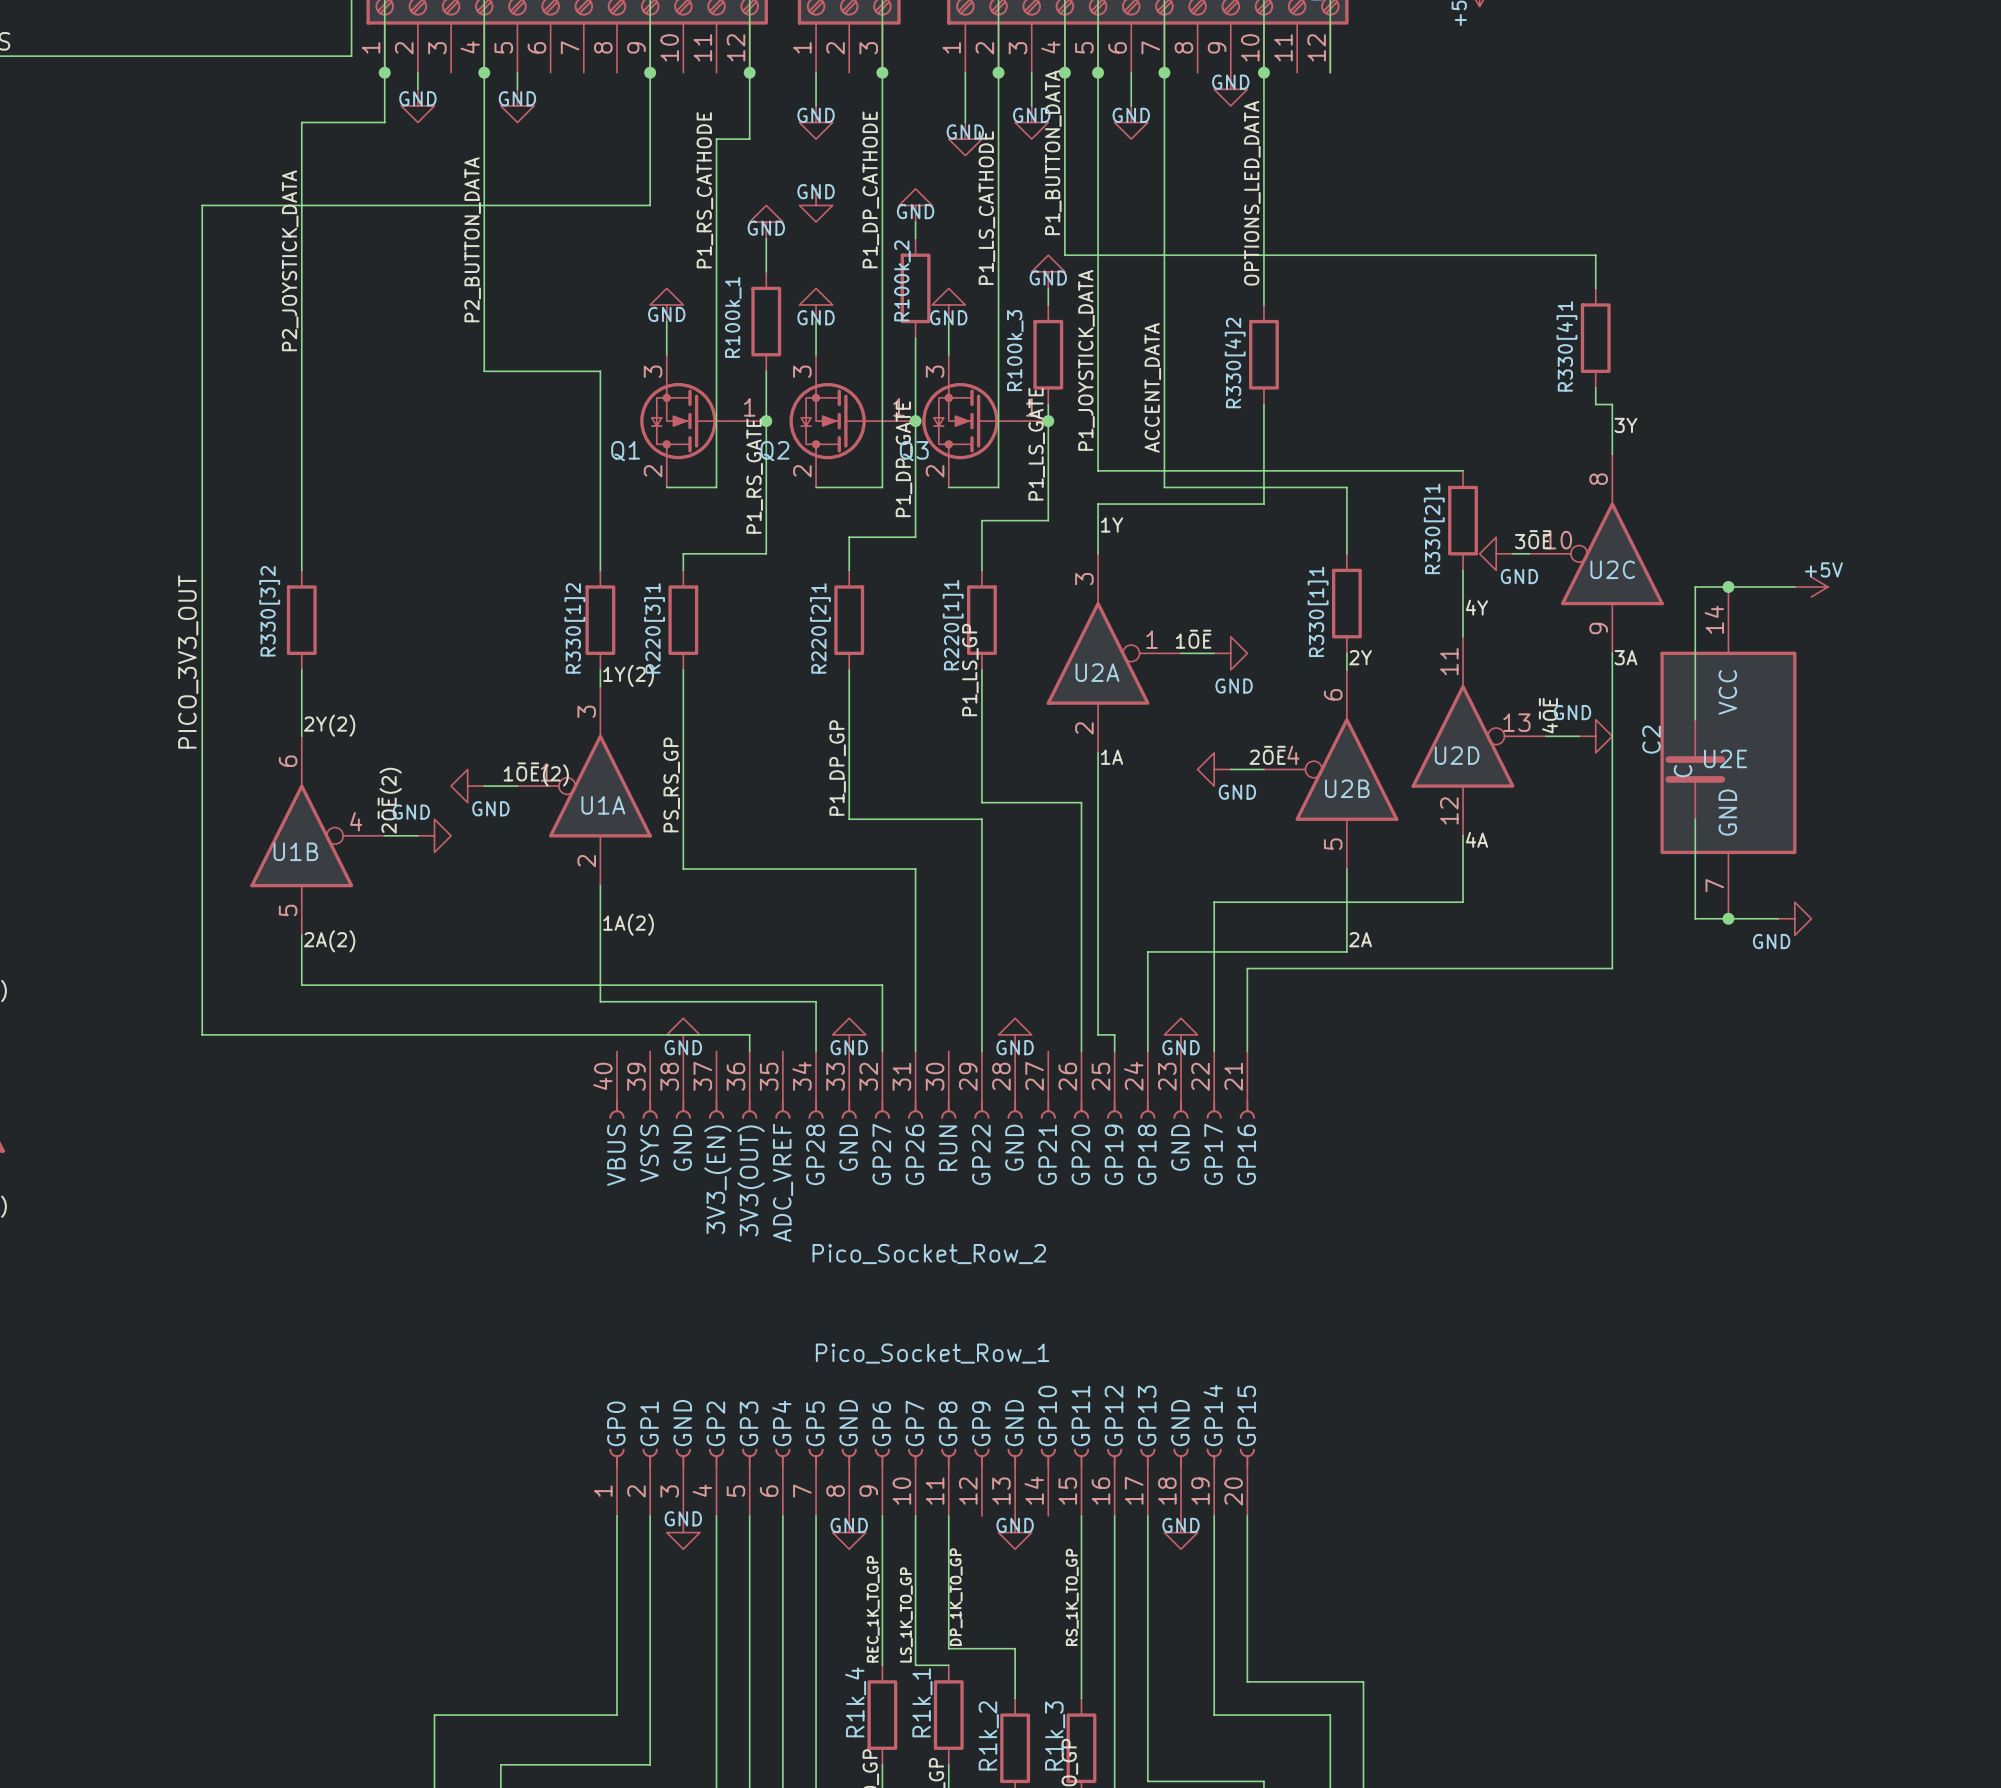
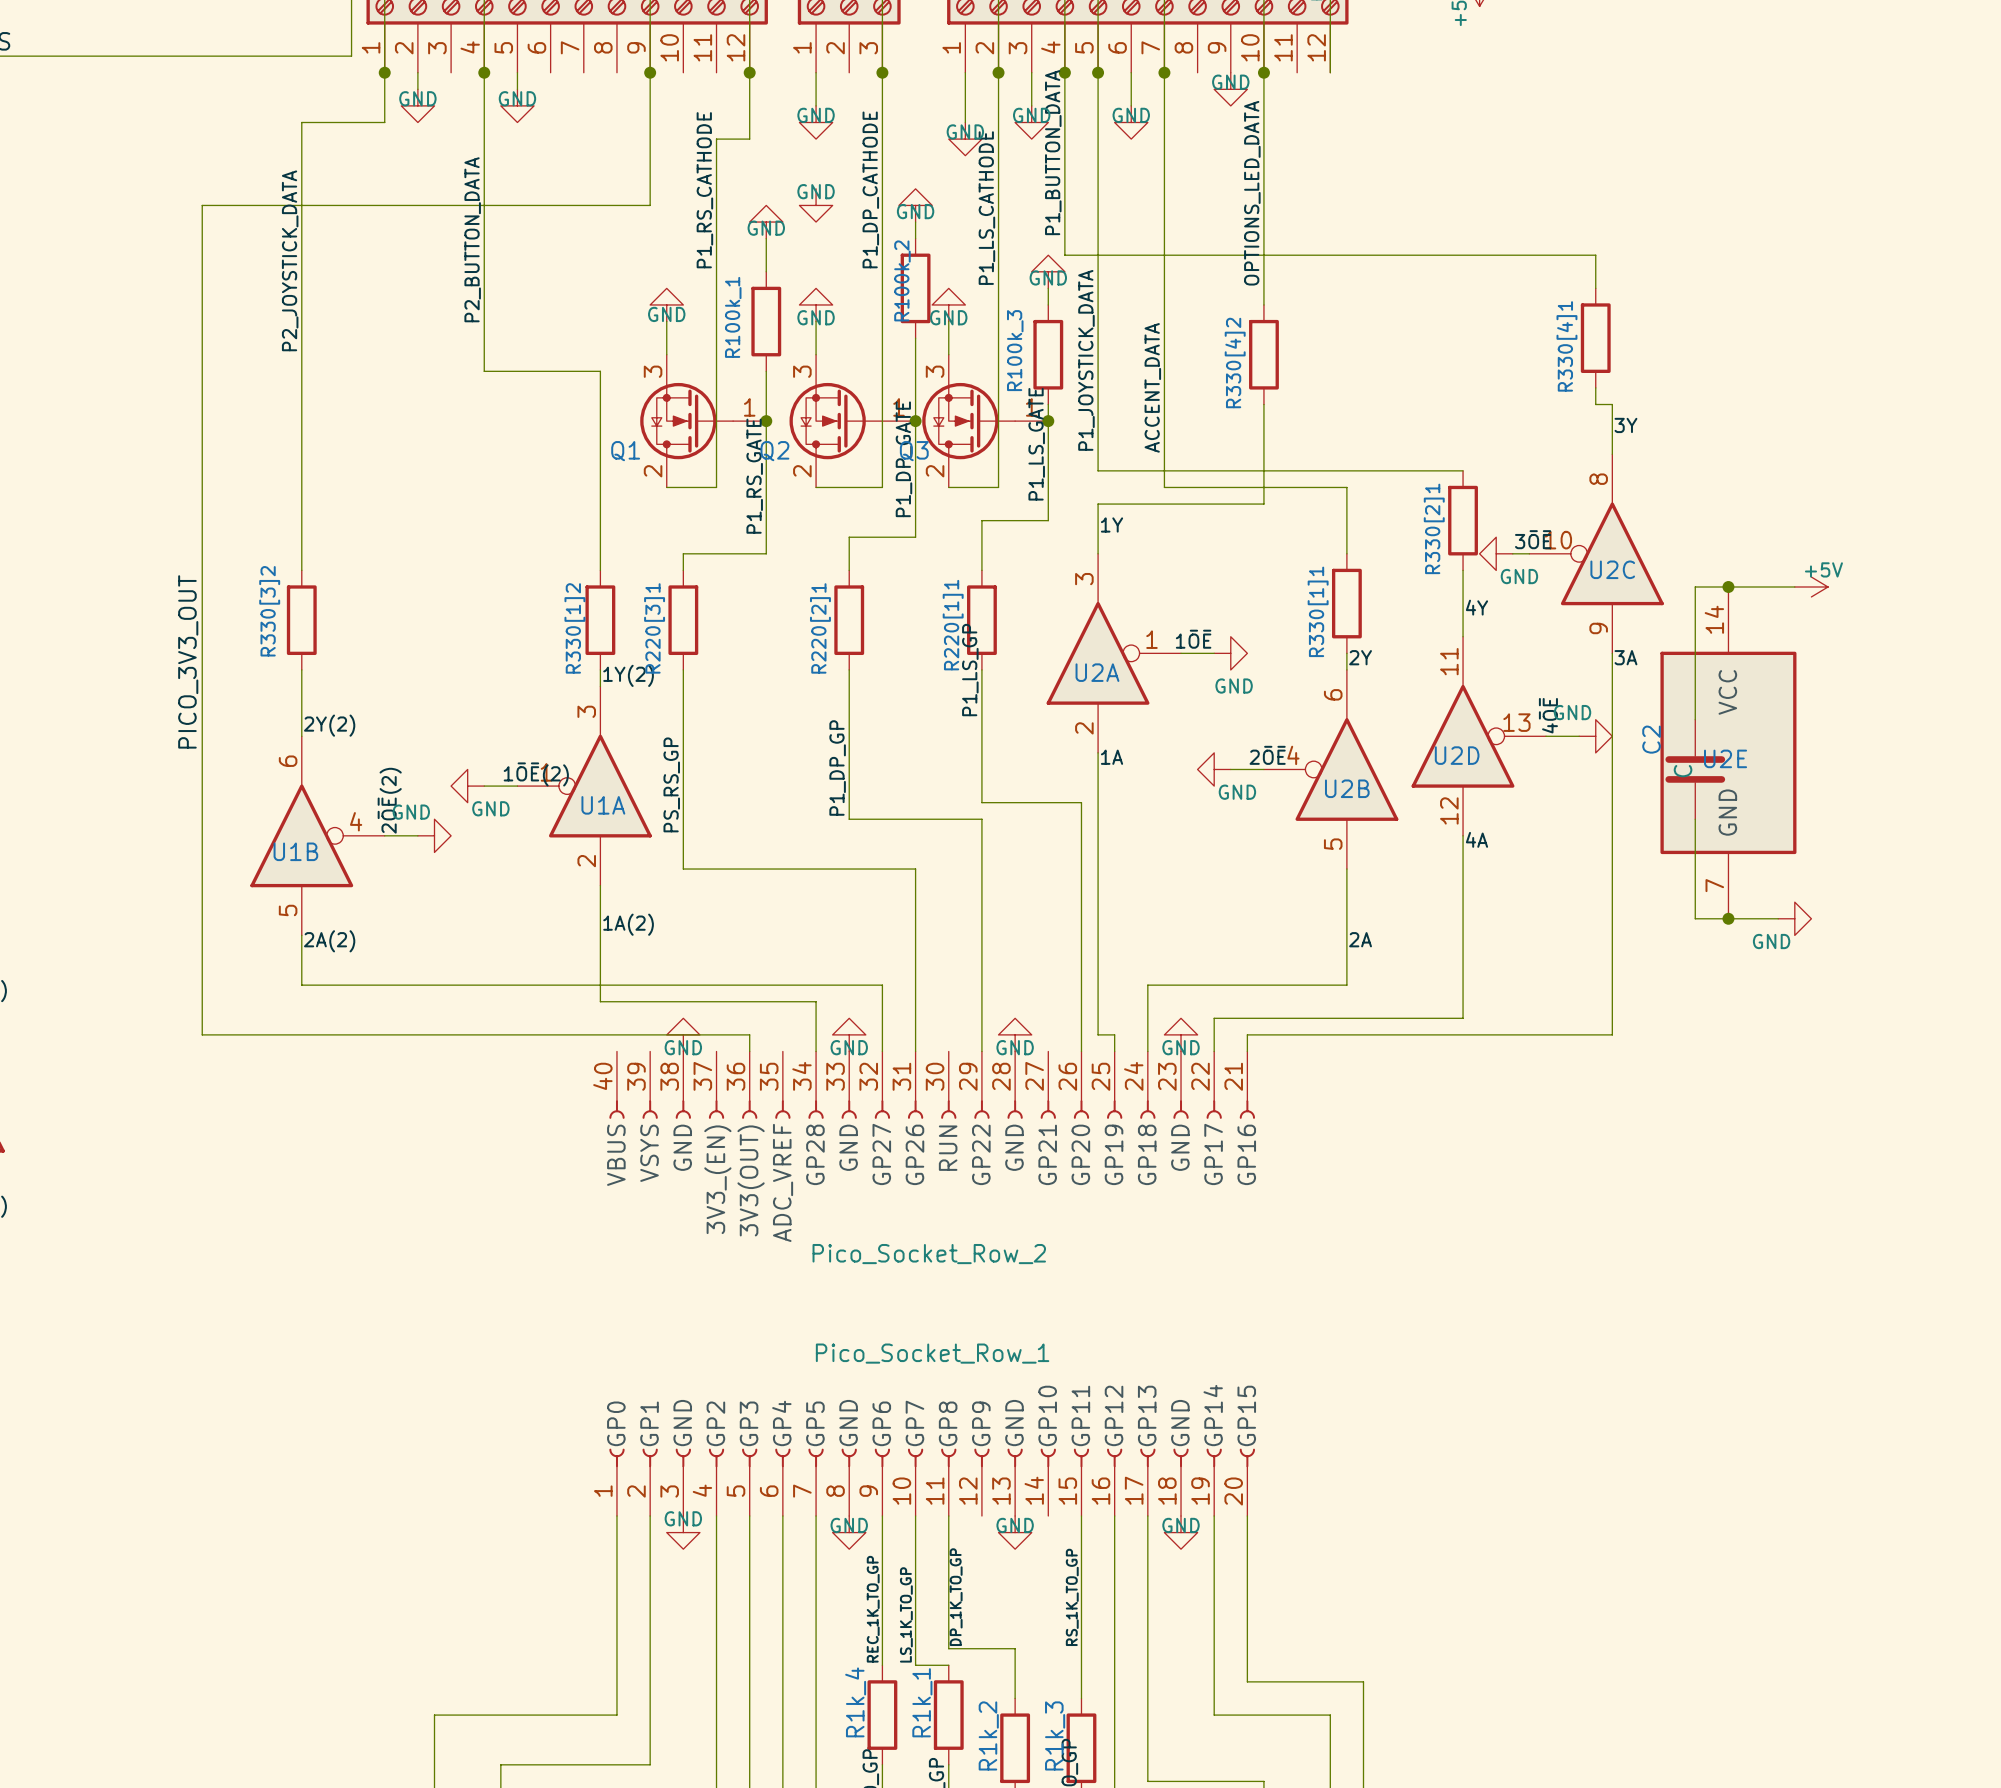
wire: (1463, 902) (1214, 902) (1214, 1018) -> (1463, 902) (1463, 1018) (1214, 1018)
wire: (1346, 951) (1147, 951) (1147, 985) -> (1346, 951) (1346, 985) (1147, 985)
wire: (1612, 968) (1247, 968) (1247, 1034) -> (1612, 968) (1612, 1034) (1247, 1034)

